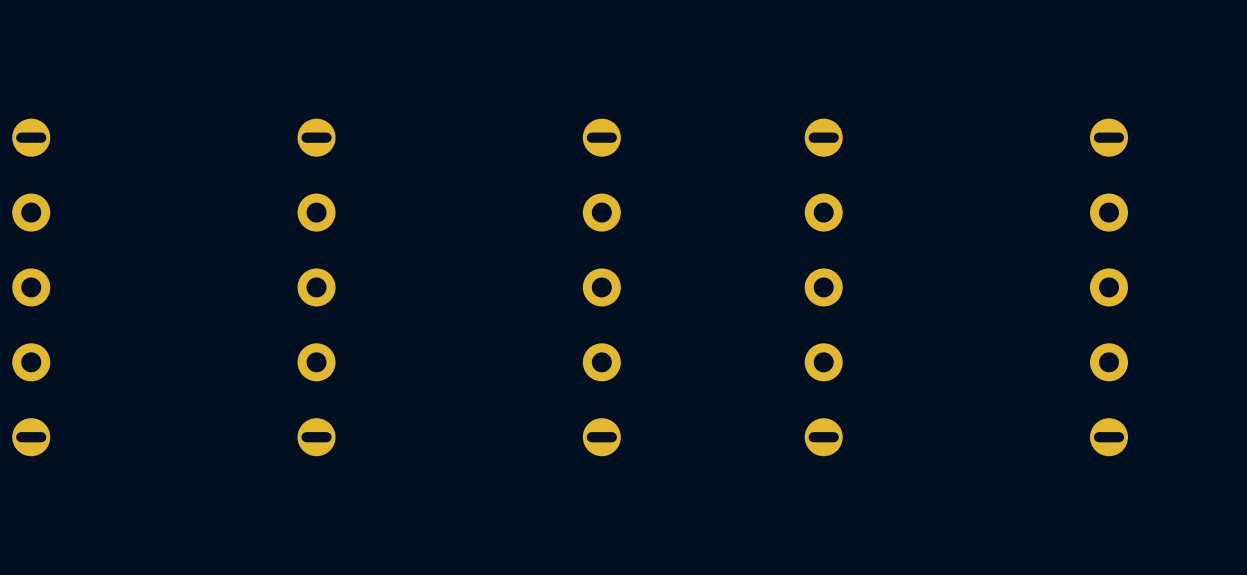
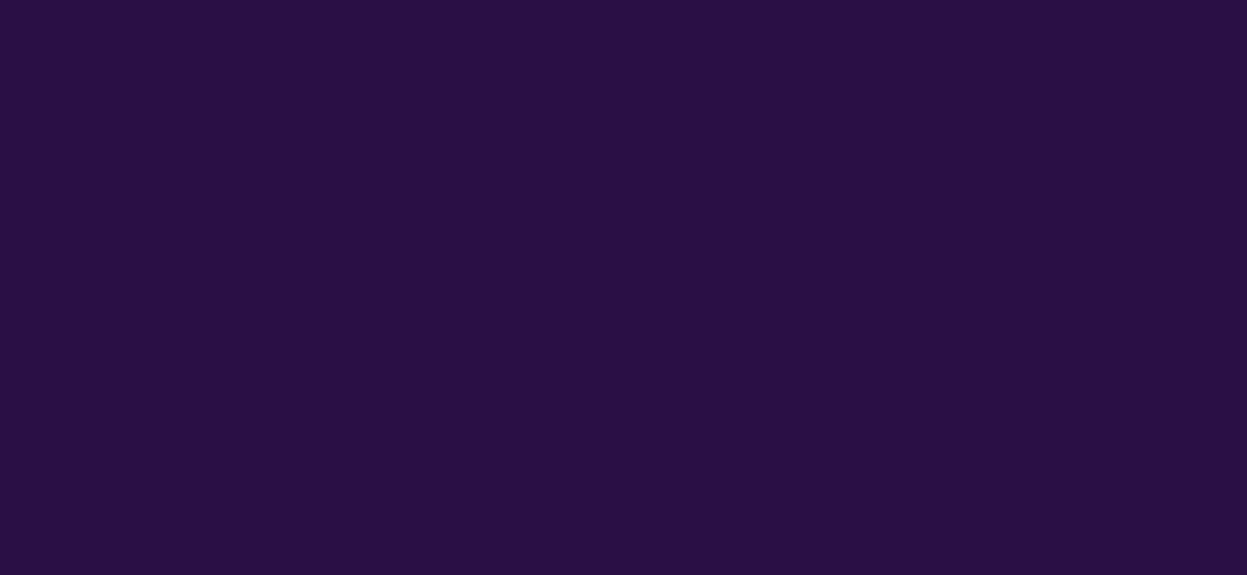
part: (31, 287) -> none
part: (316, 287) -> none
part: (601, 287) -> none
part: (823, 287) -> none
part: (1109, 287) -> none

